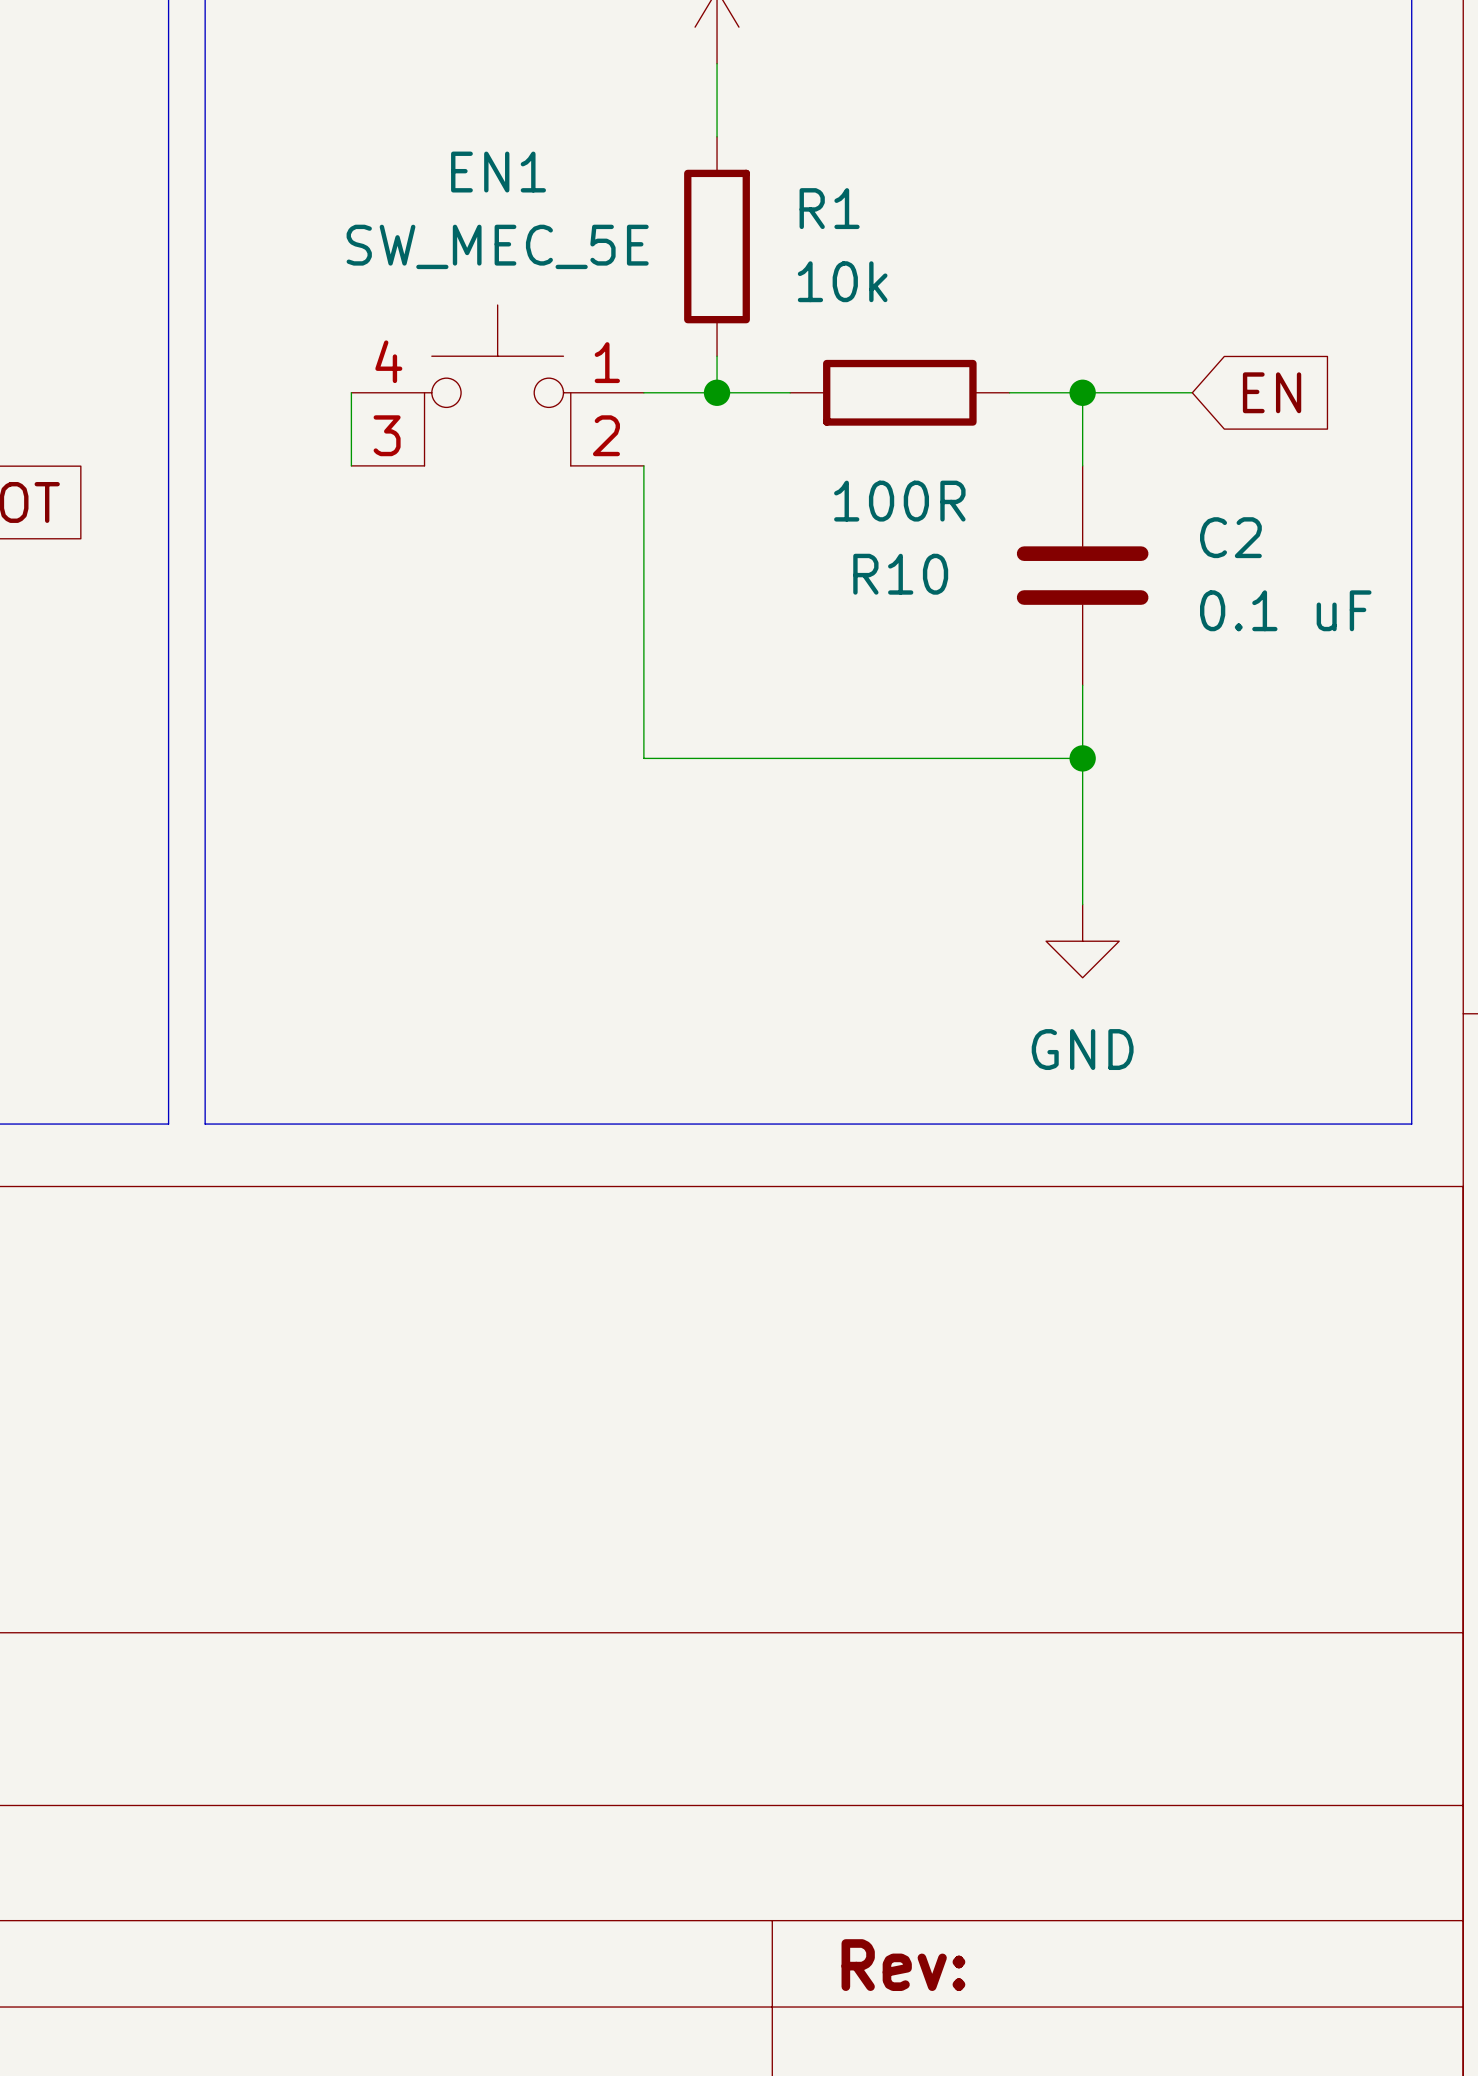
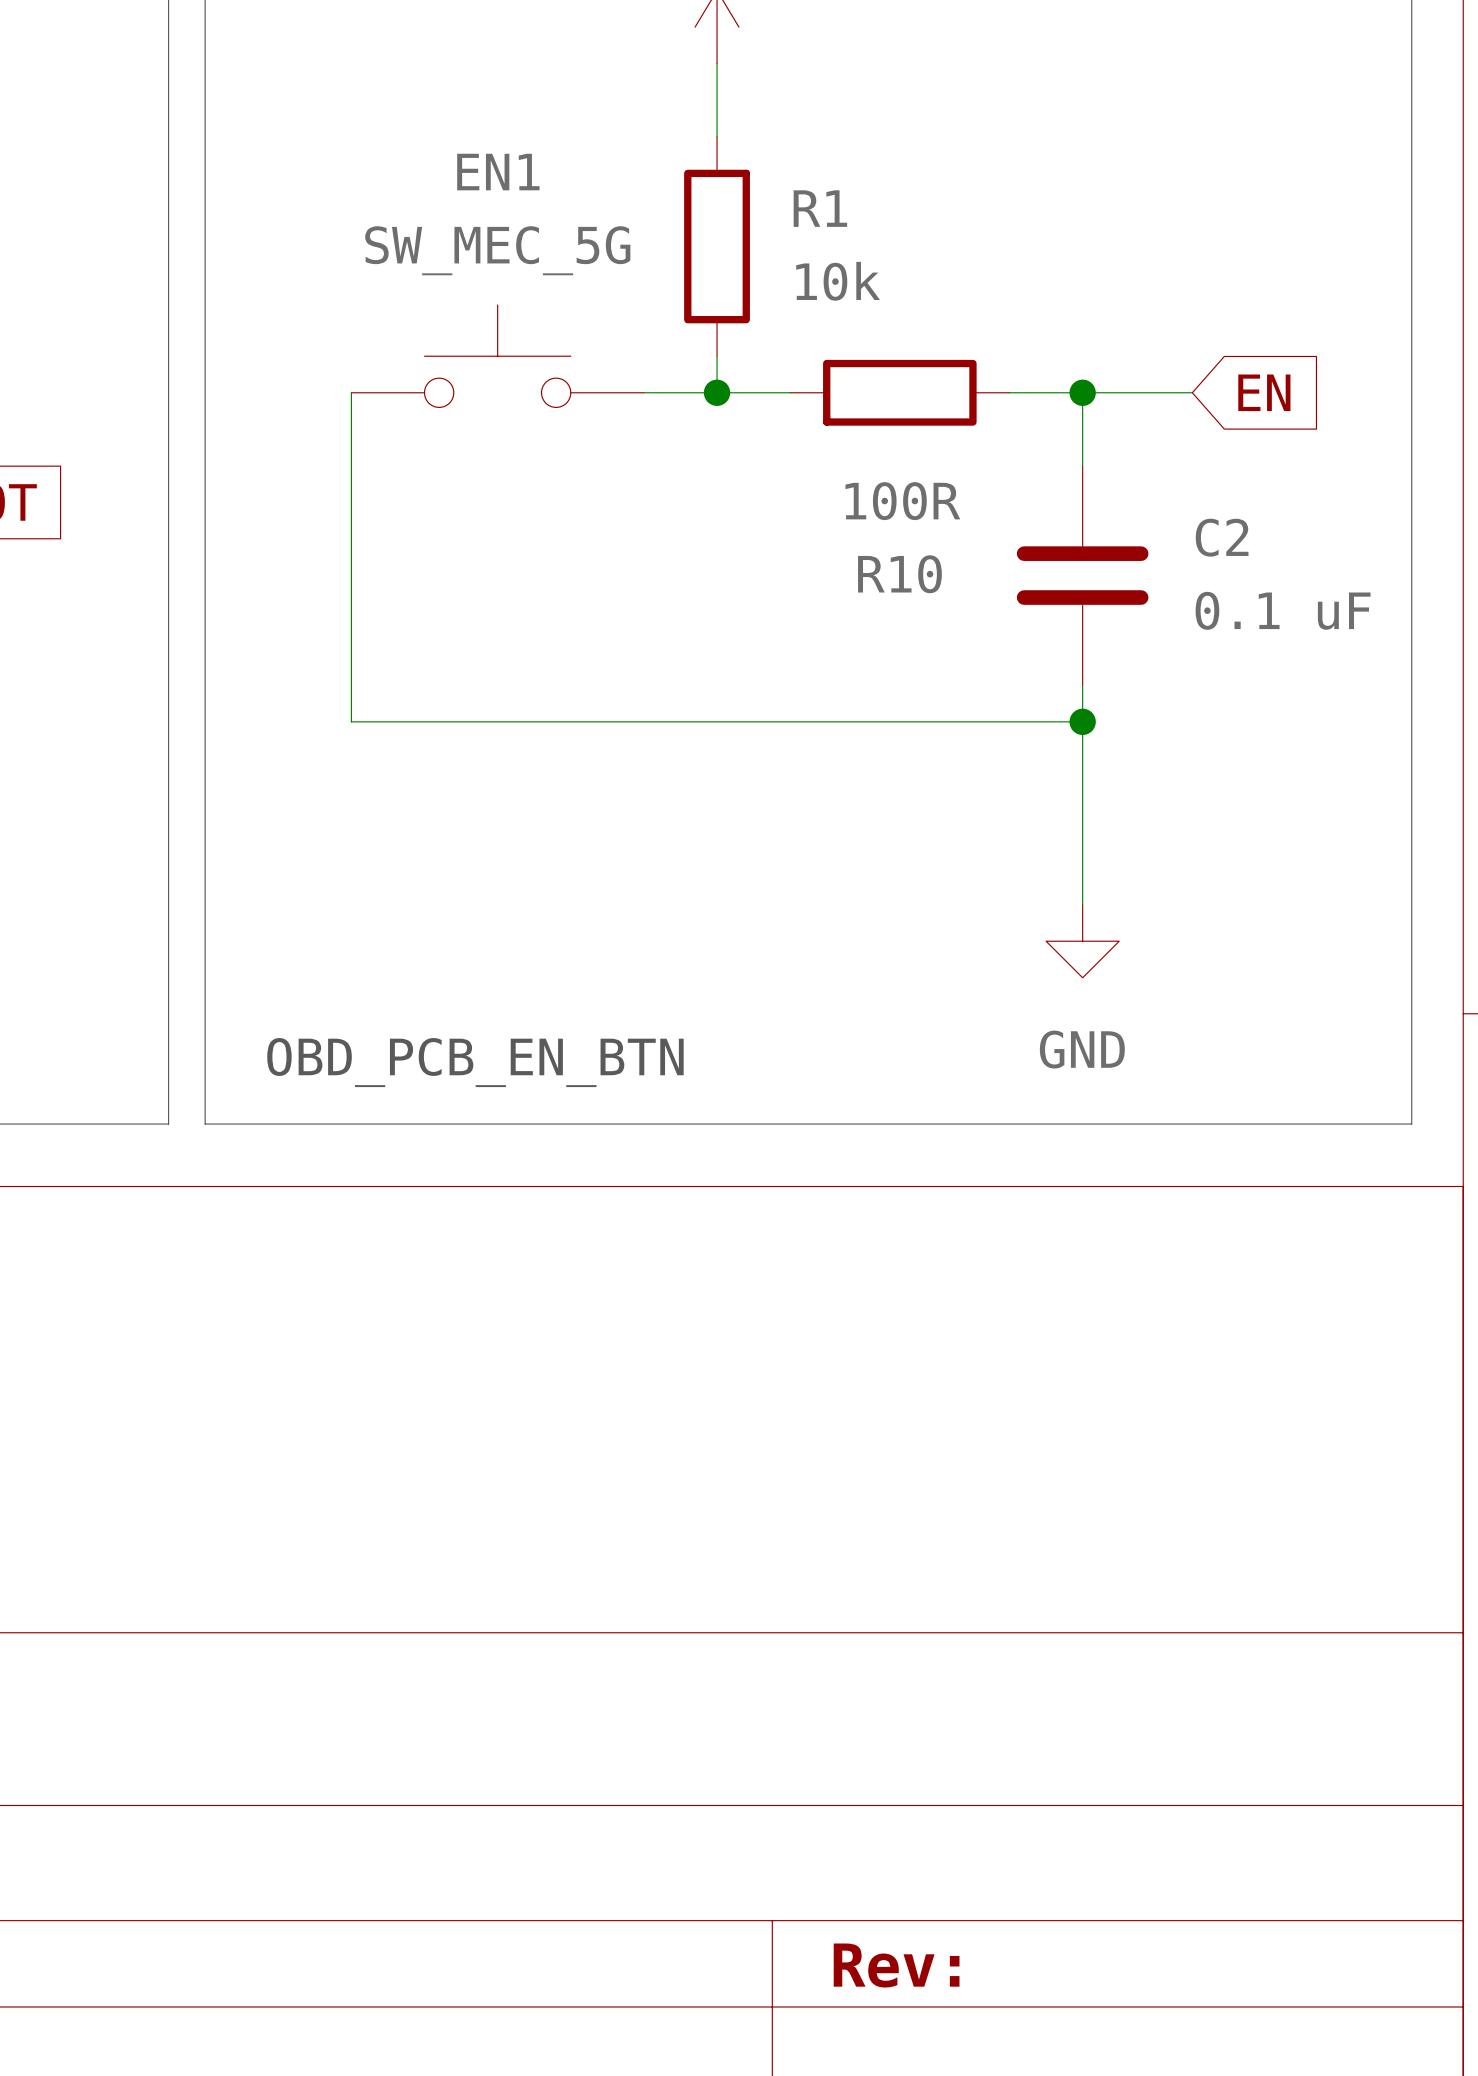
EN1 value: SW_MEC_5E (497, 246) -> SW_MEC_5G (497, 250)
EN1 symbol: [351, 305, 644, 466] -> [351, 305, 644, 408]
wire: none -> (351, 465) (351, 721) (1082, 721)
wire: (643, 465) (643, 758) (1082, 758) -> none
junction position: (1082, 758) -> (1082, 721)
text: none -> OBD_PCB_EN_BTN (475, 1062)

